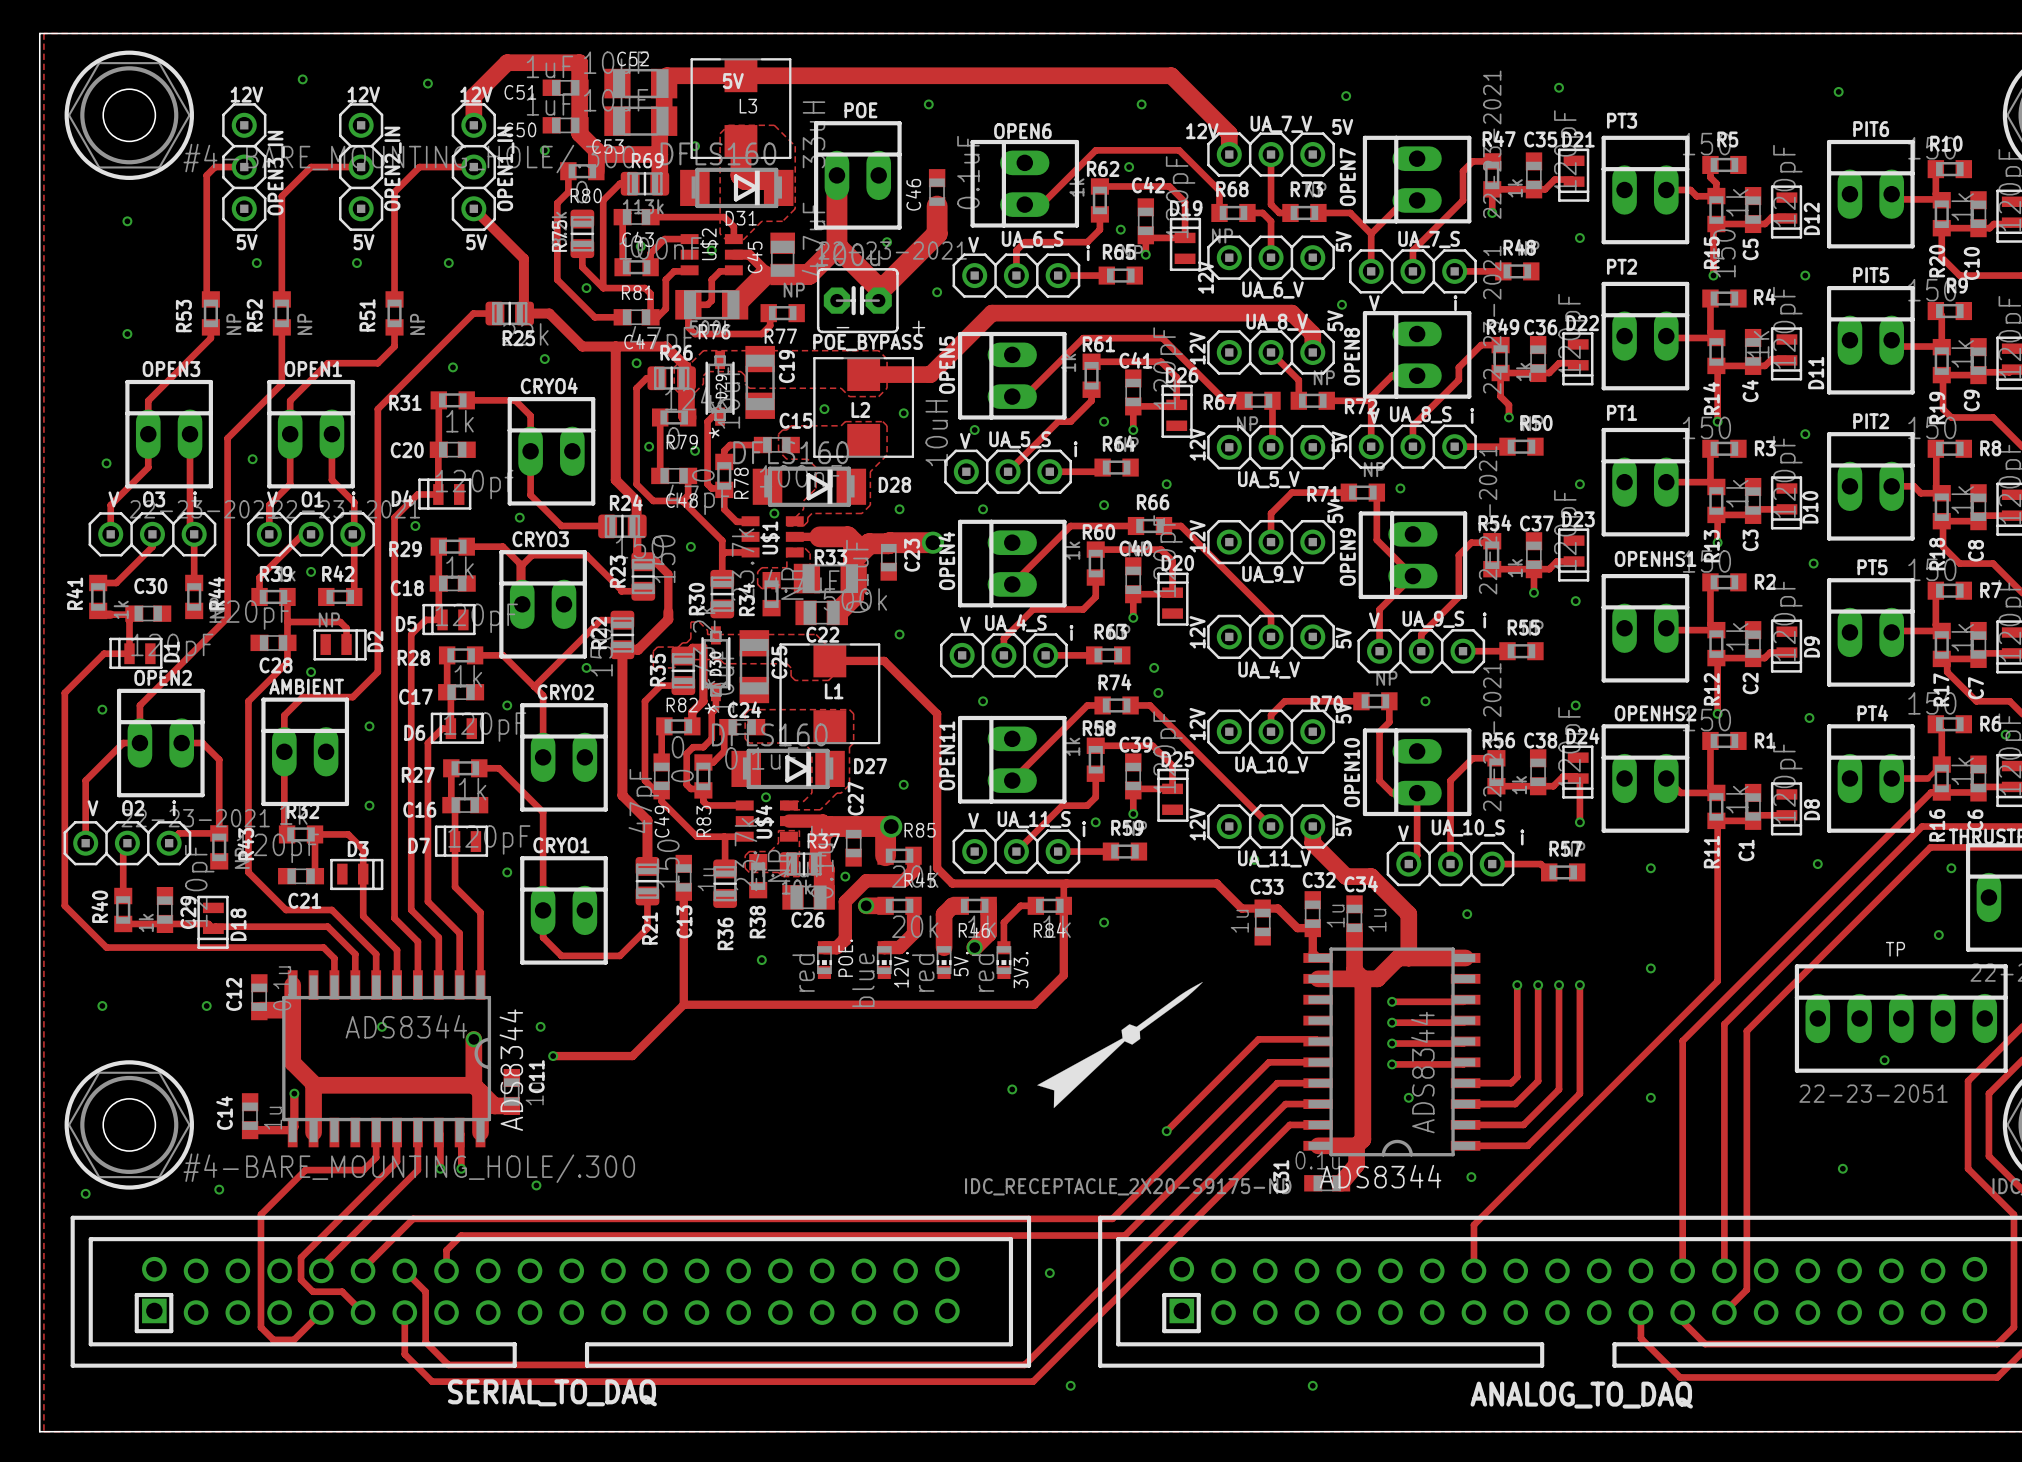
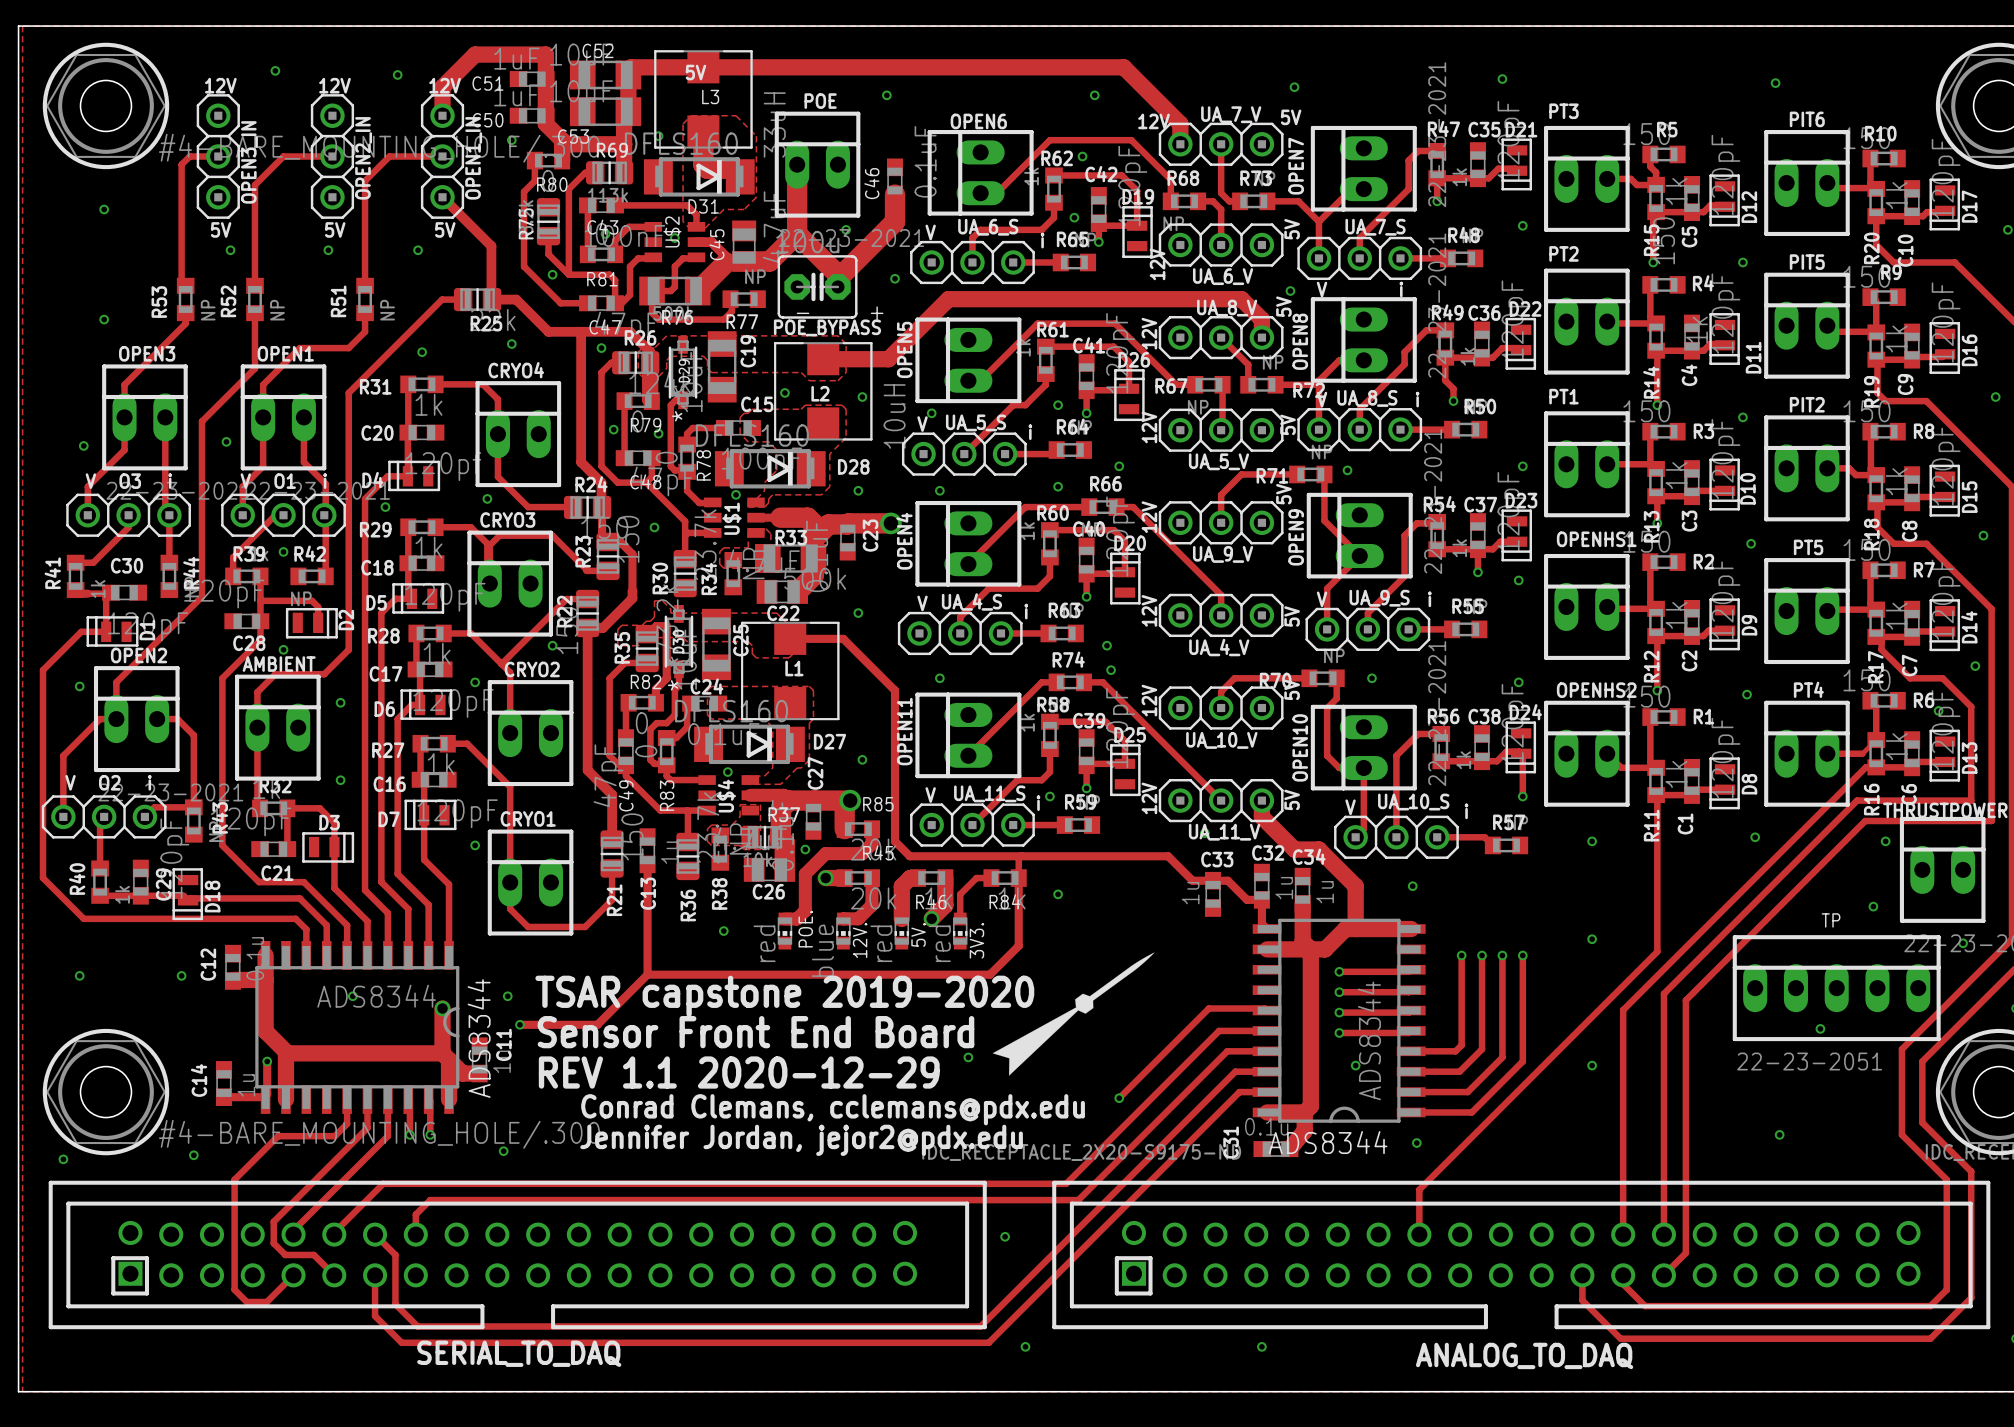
text: none -> TSAR capstone 2019-2020 (784, 996)
text: none -> Sensor Front End Board (755, 1032)
text: none -> REV 1.1 2020-12-29 (739, 1072)
text: none -> Conrad Clemans, cclemans@pdx.edu (833, 1109)
text: none -> Jennifer Jordan, jejor2@pdx.edu (801, 1140)

